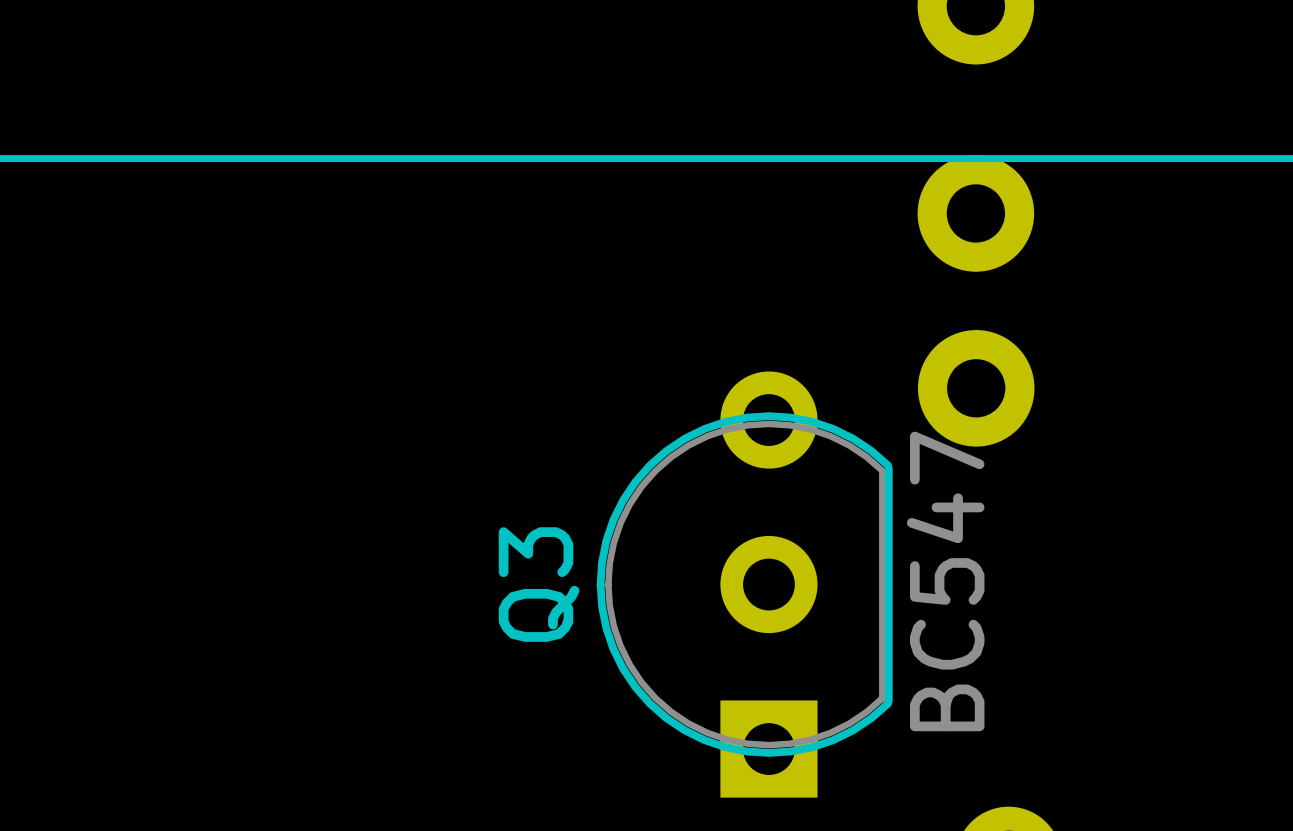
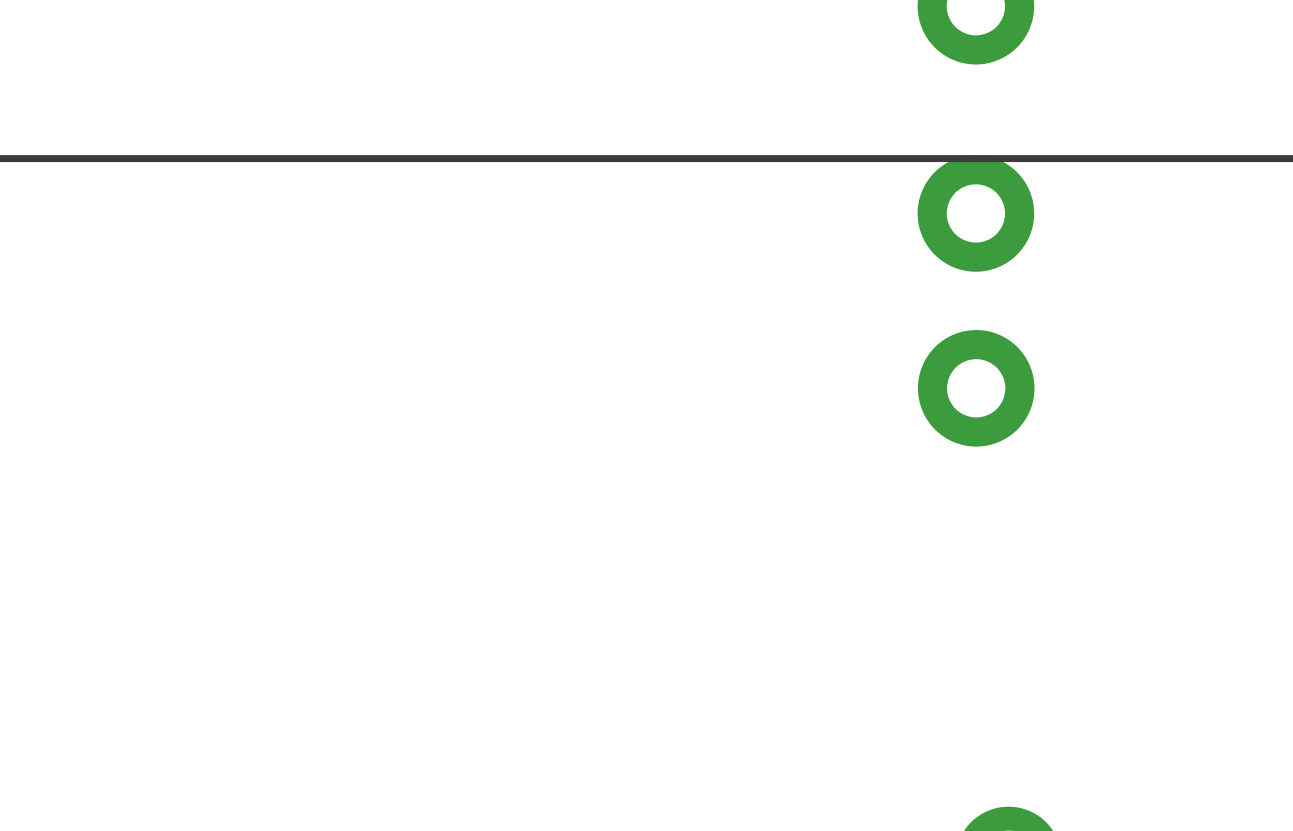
Q3: BC547 (744, 584) -> none

